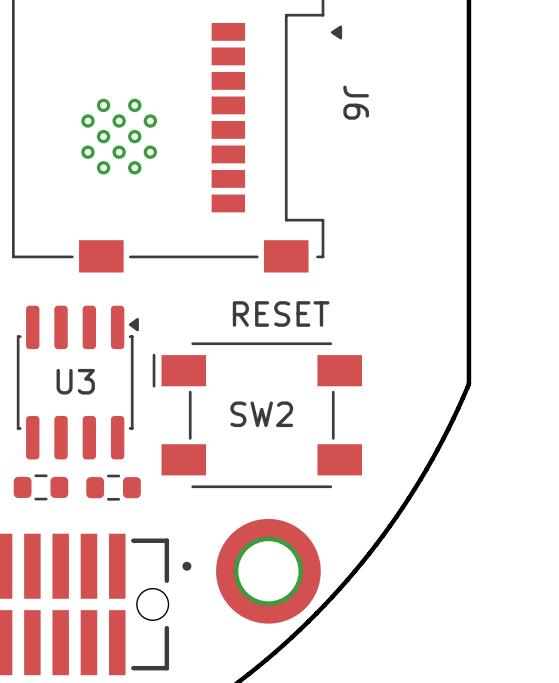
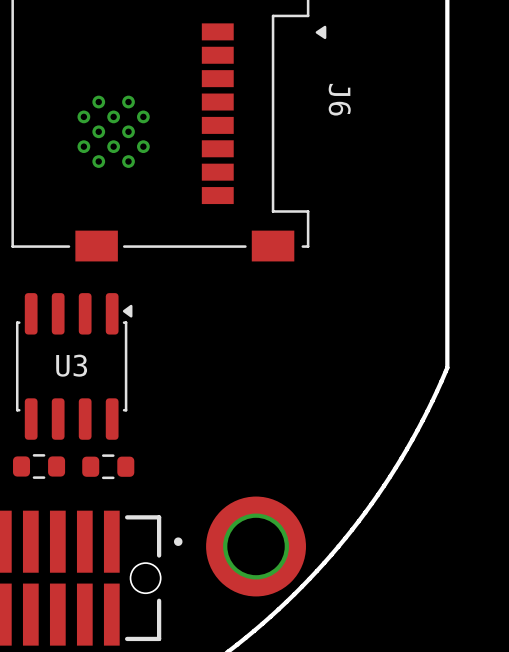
text: RESET (281, 314) -> none
SW2: (257, 415) -> none

